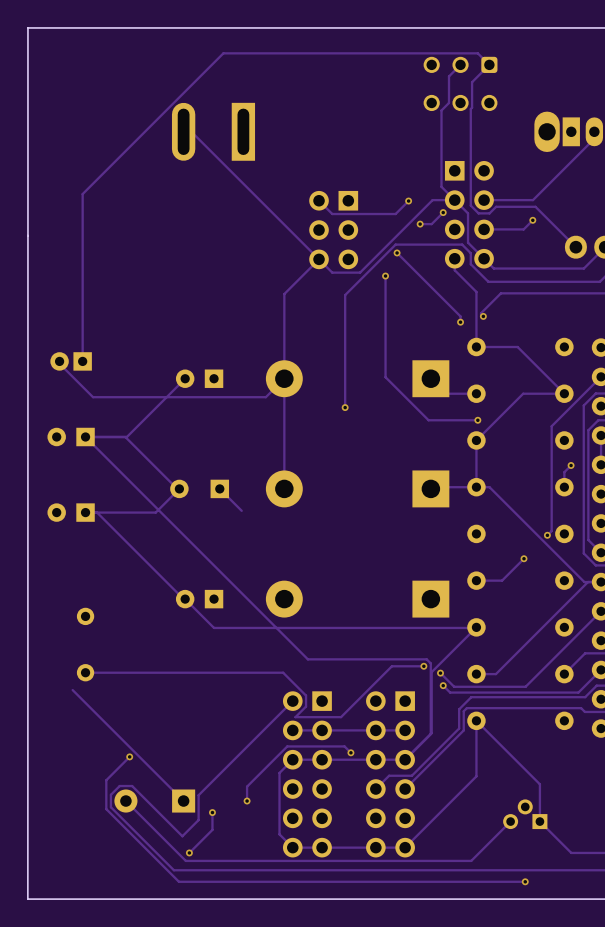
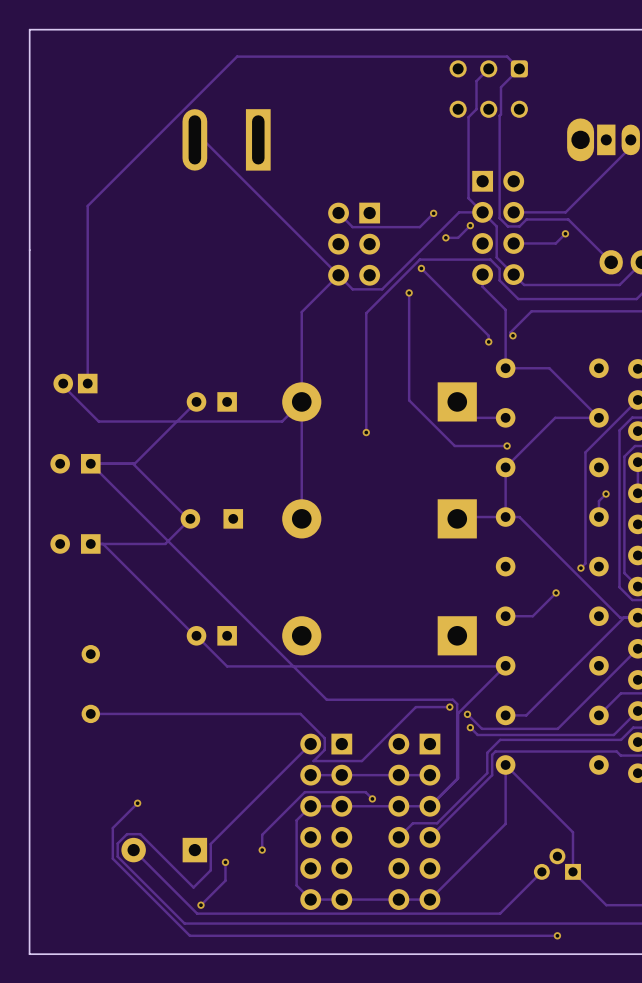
track: (219, 488) (241, 510) -> none
track: (72, 690) (183, 801) -> none

